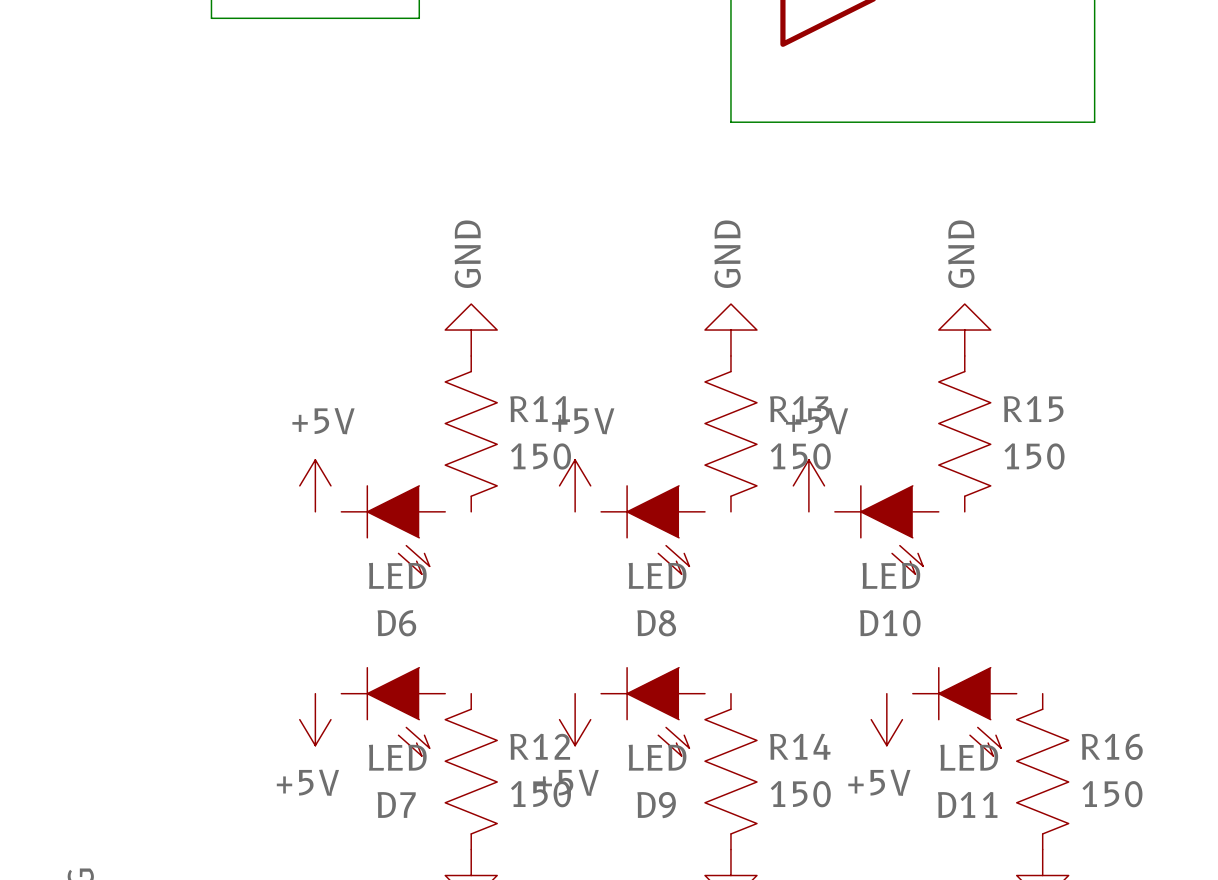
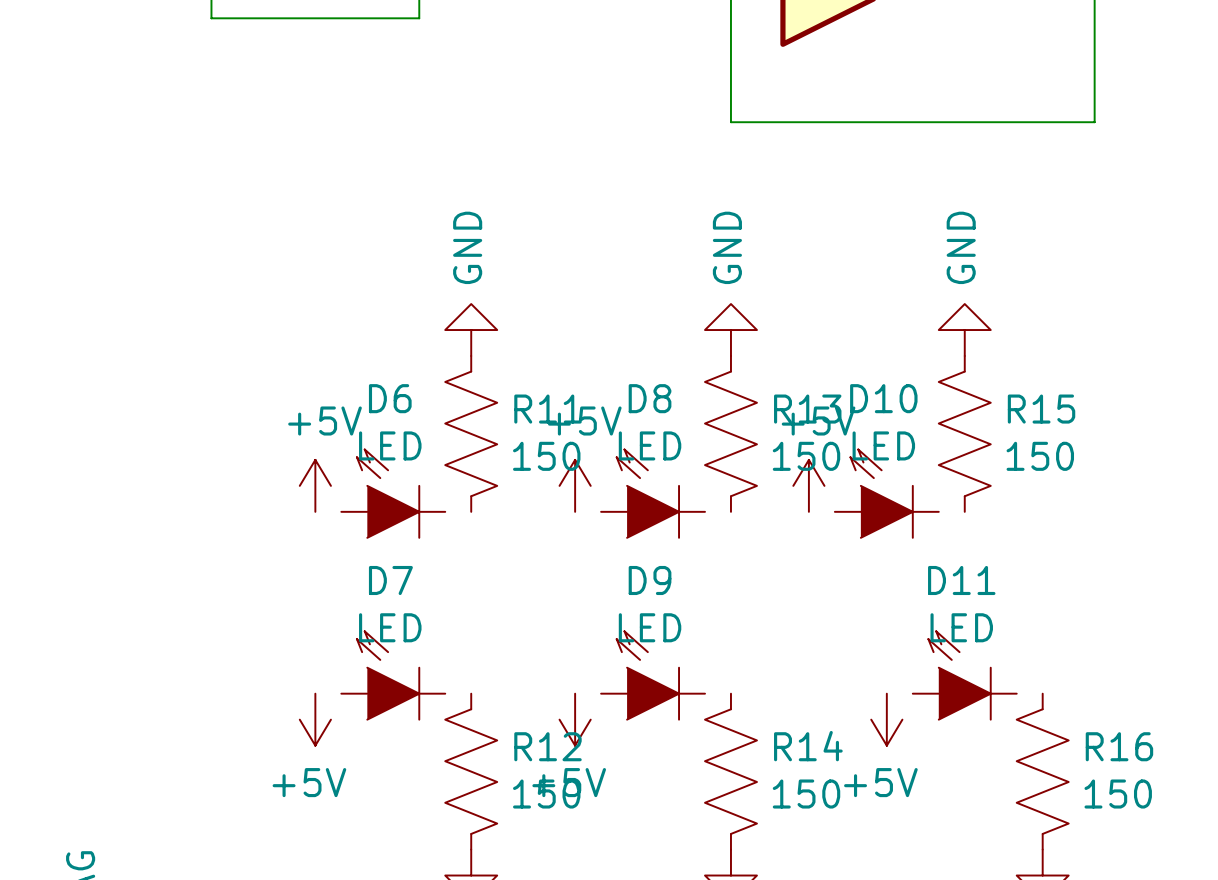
D6 rotation: 0° (398, 530) -> 180° (388, 493)
D8 rotation: 0° (658, 530) -> 180° (647, 493)
D10 rotation: 0° (892, 530) -> 180° (881, 493)
D7 rotation: 0° (398, 711) -> 180° (388, 675)
D9 rotation: 0° (658, 711) -> 180° (647, 675)
D11 rotation: 0° (969, 711) -> 180° (959, 675)

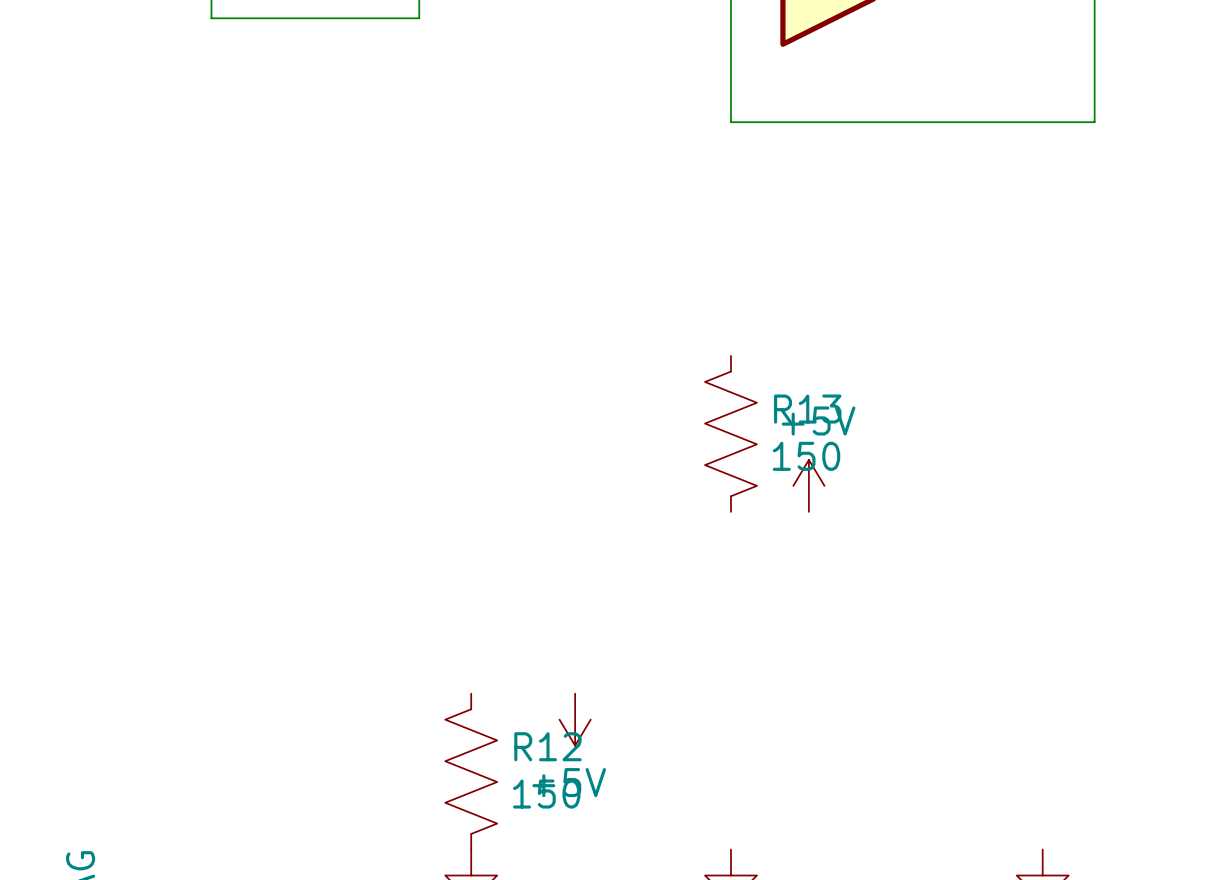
power symbol: GND (471, 330) -> none
power symbol: GND (730, 330) -> none
power symbol: GND (964, 330) -> none
R11: 150 (471, 433) -> none
R15: 150 (964, 433) -> none
power symbol: +5V (315, 485) -> none
power symbol: +5V (575, 485) -> none
D6: LED (393, 493) -> none
D8: LED (653, 493) -> none
D10: LED (886, 493) -> none
D7: LED (393, 675) -> none
D9: LED (653, 675) -> none
D11: LED (964, 675) -> none
power symbol: +5V (315, 719) -> none
power symbol: +5V (886, 719) -> none
R14: 150 (730, 771) -> none
R16: 150 (1042, 771) -> none

